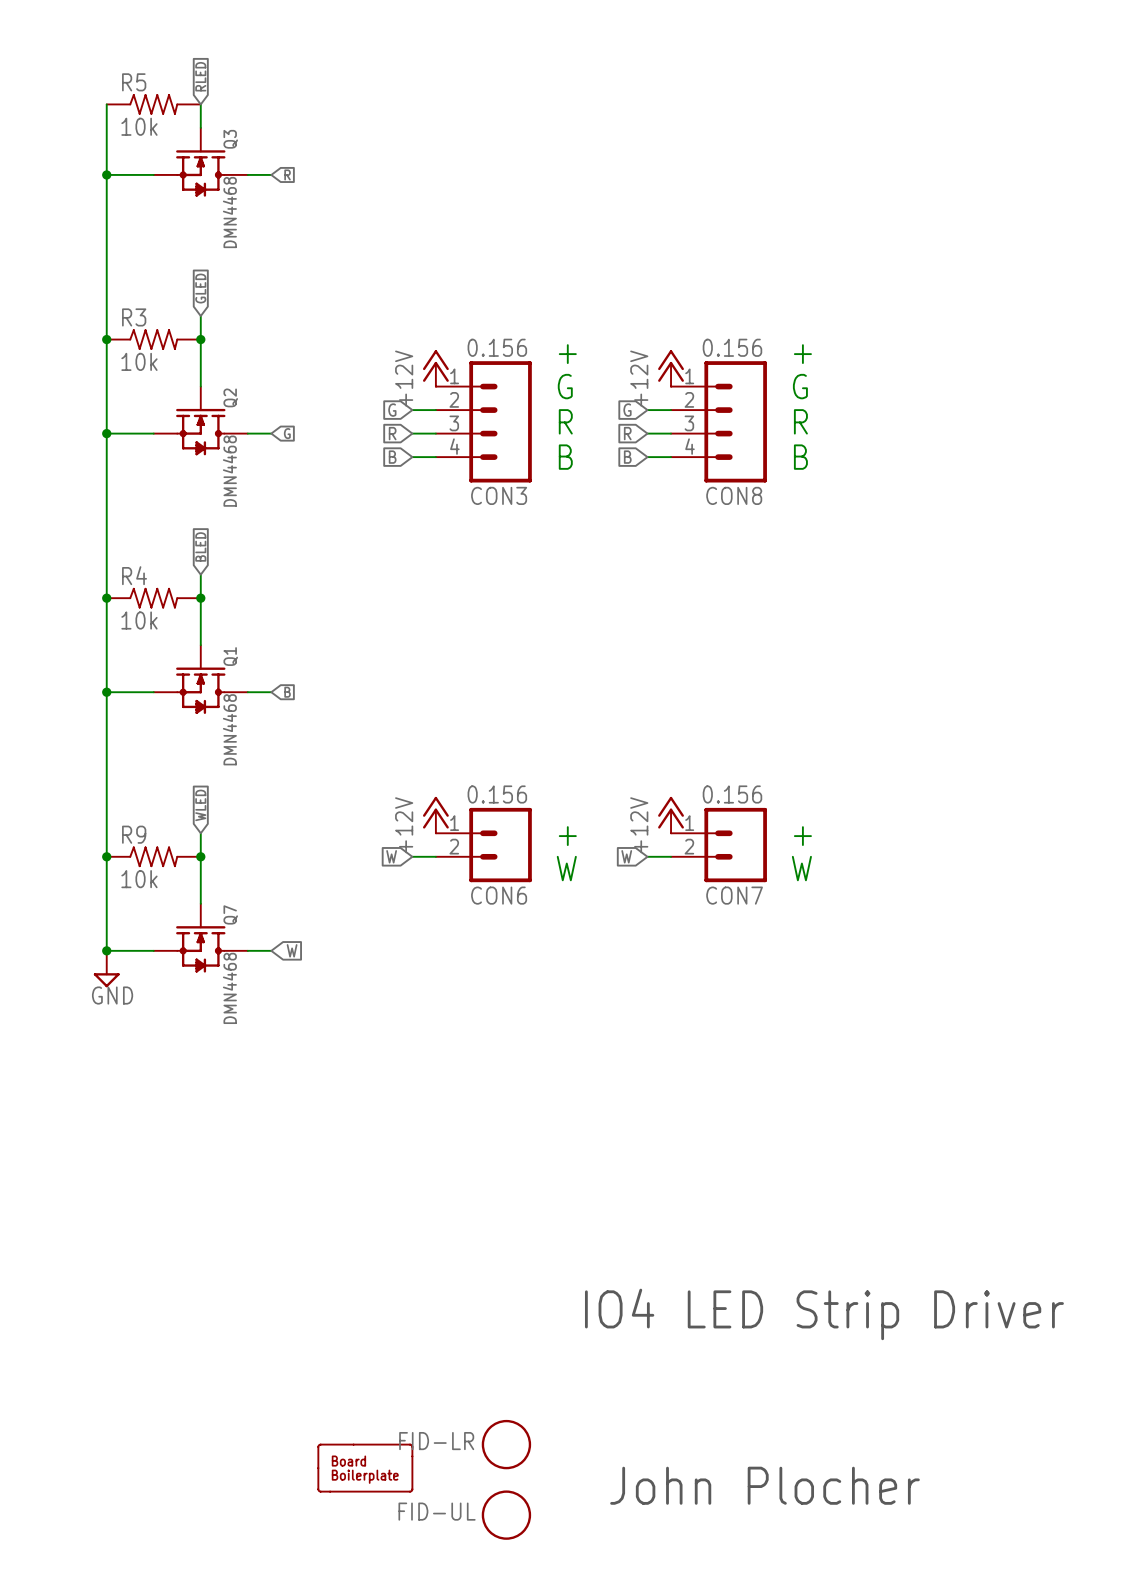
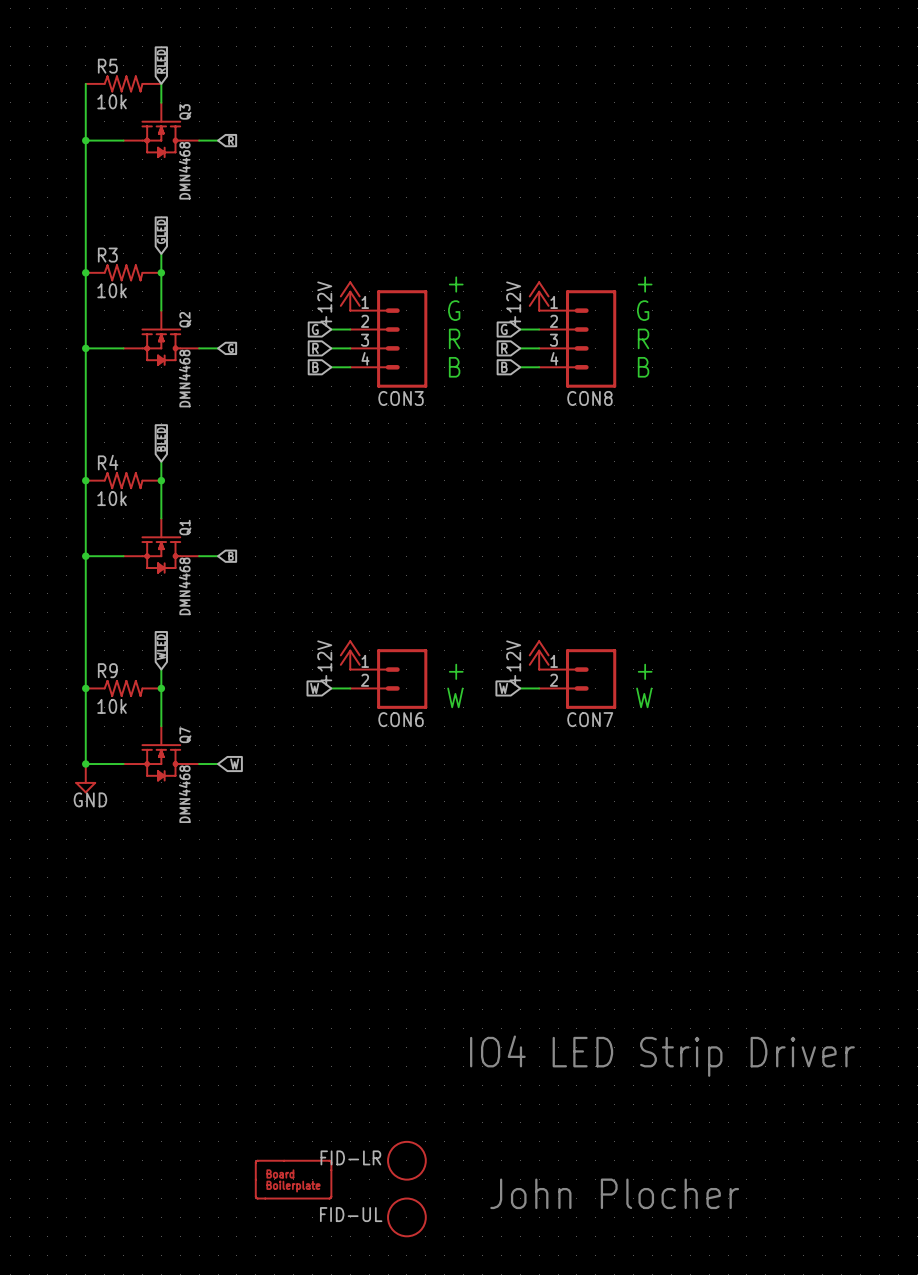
CON3 value: 0.156 (497, 347) -> none
CON8 value: 0.156 (732, 347) -> none
CON6 value: 0.156 (497, 794) -> none
CON7 value: 0.156 (732, 794) -> none

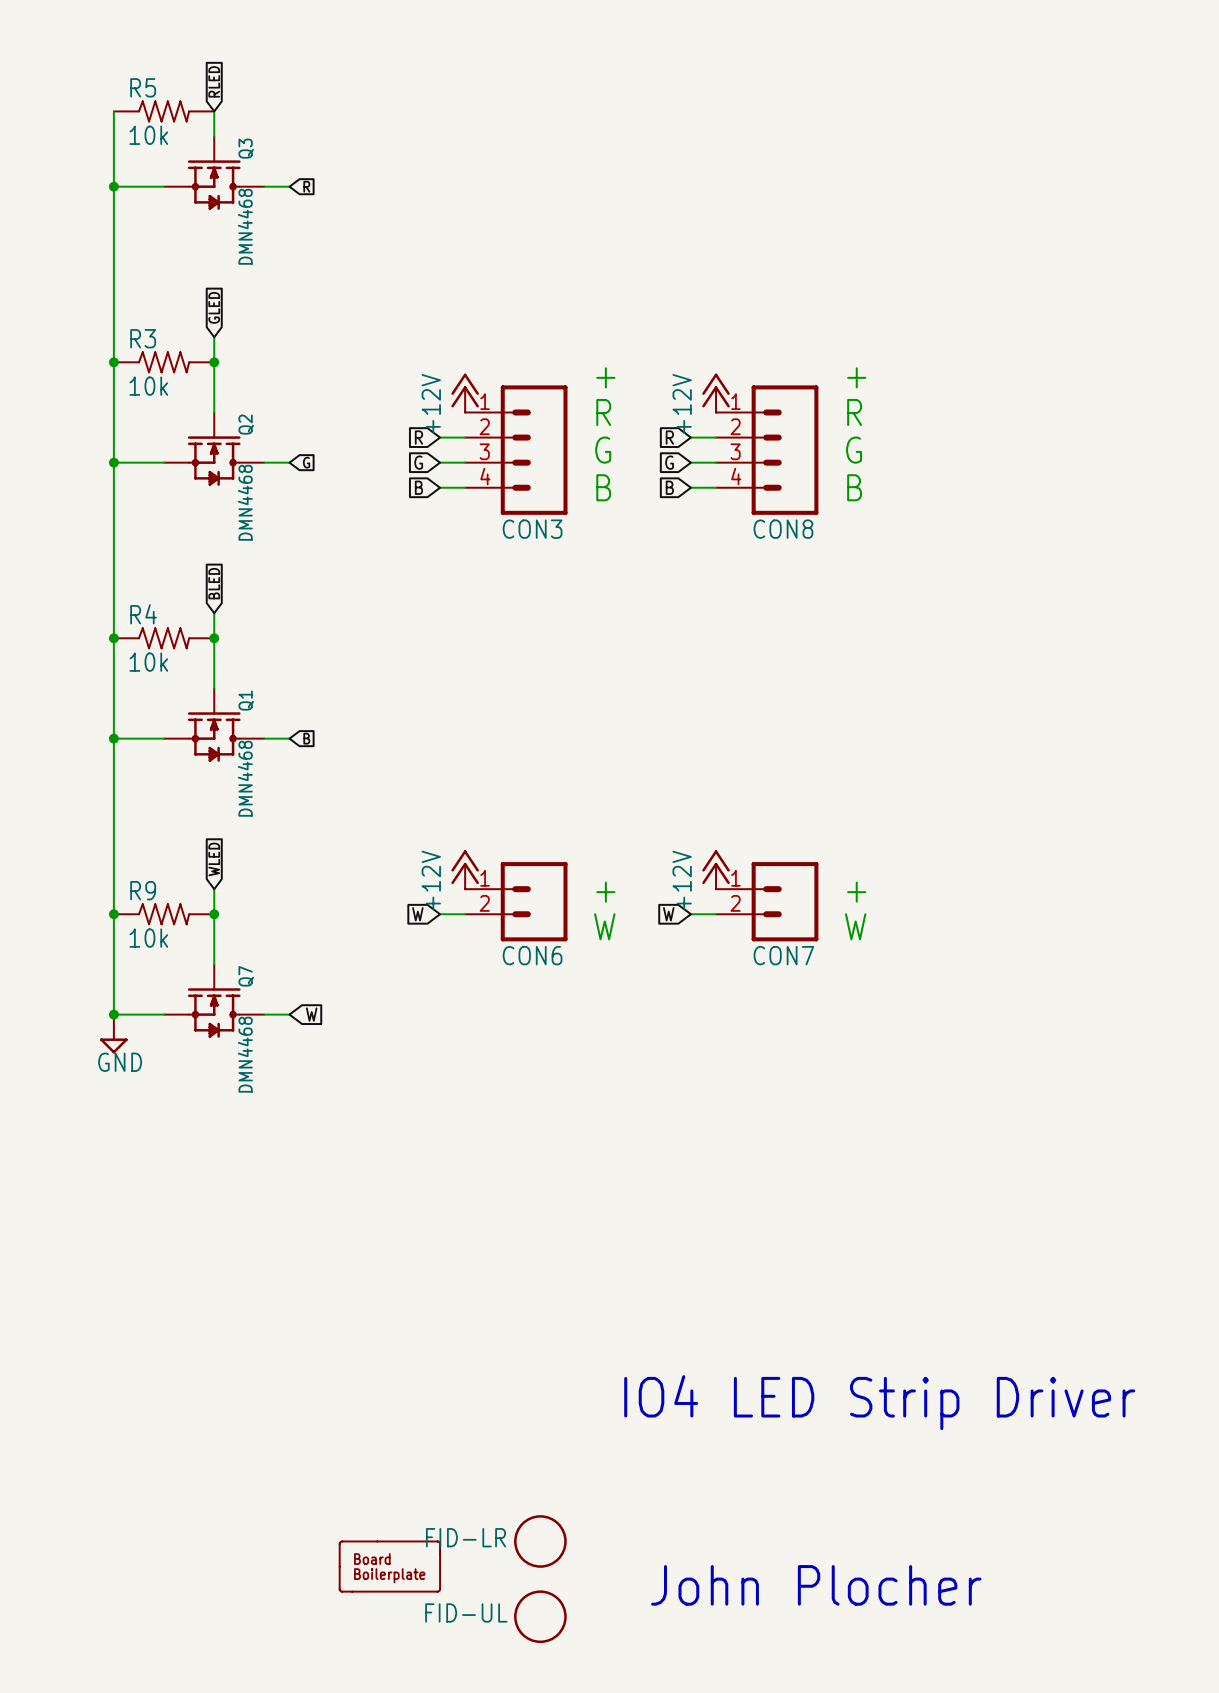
text: G (454, 310) -> R (603, 412)
text: G (643, 310) -> R (854, 412)
global label: G (315, 329) -> R (418, 437)
global label: G (504, 329) -> R (669, 437)
text: R (454, 338) -> G (603, 450)
text: R (643, 338) -> G (854, 450)
global label: R (315, 348) -> G (418, 462)
global label: R (504, 348) -> G (669, 462)

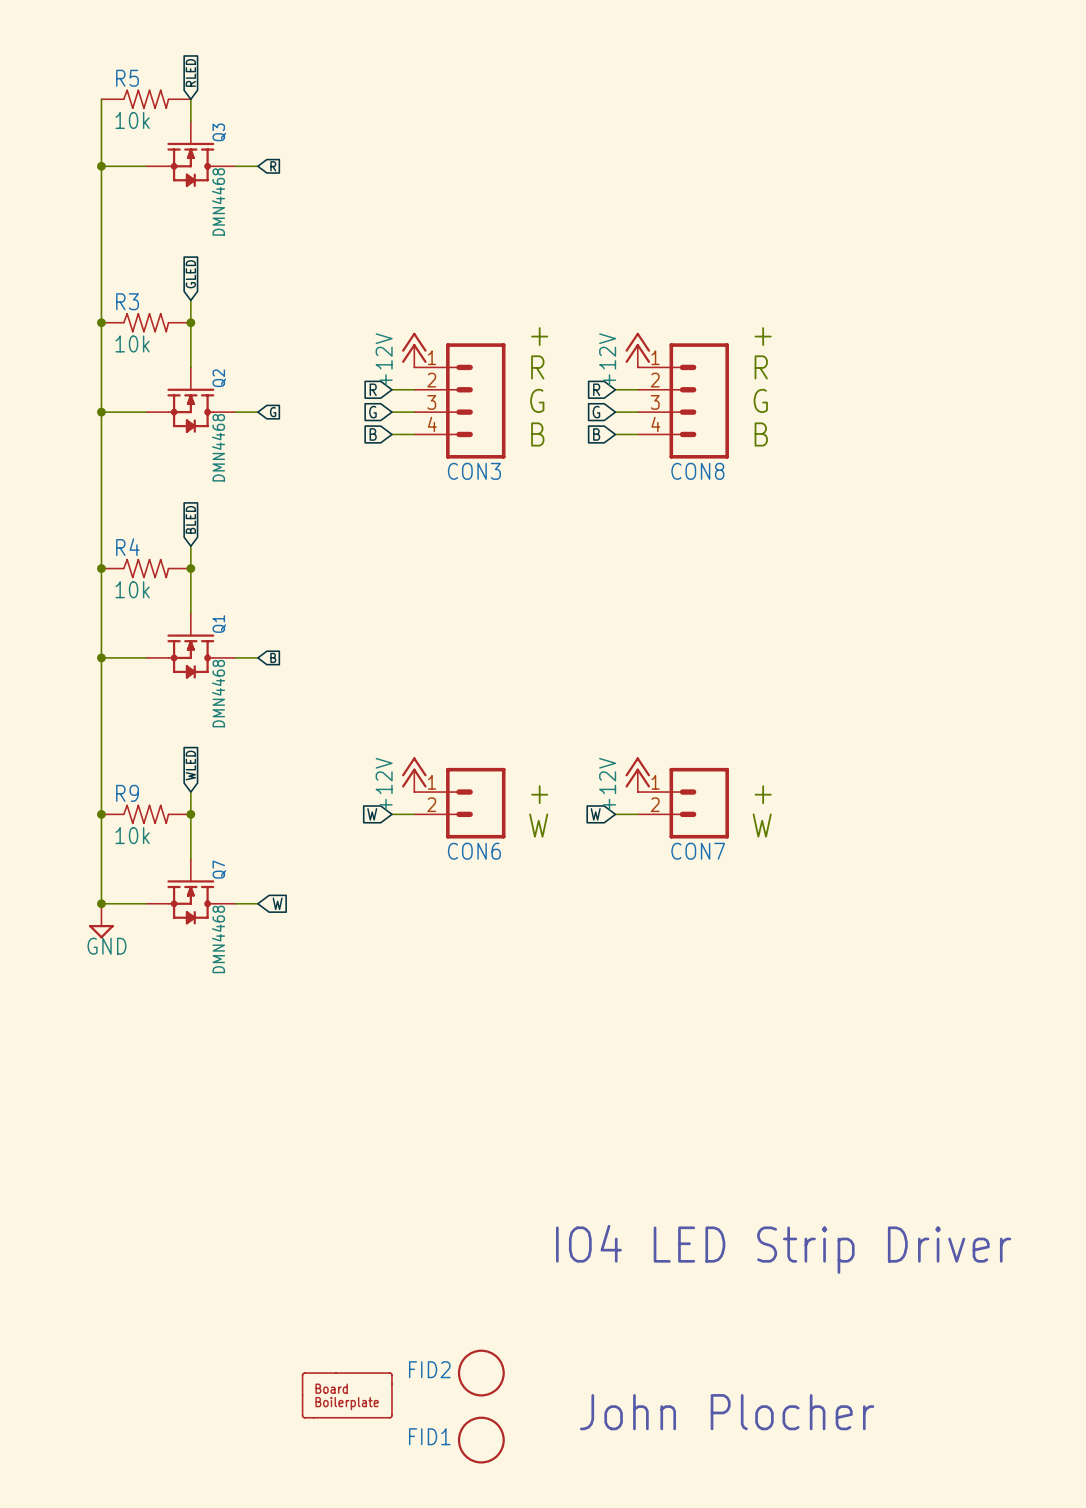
FID-LR name: FID-LR (465, 1537) -> FID2 (429, 1369)
FID-UL name: FID-UL (466, 1612) -> FID1 (429, 1436)

